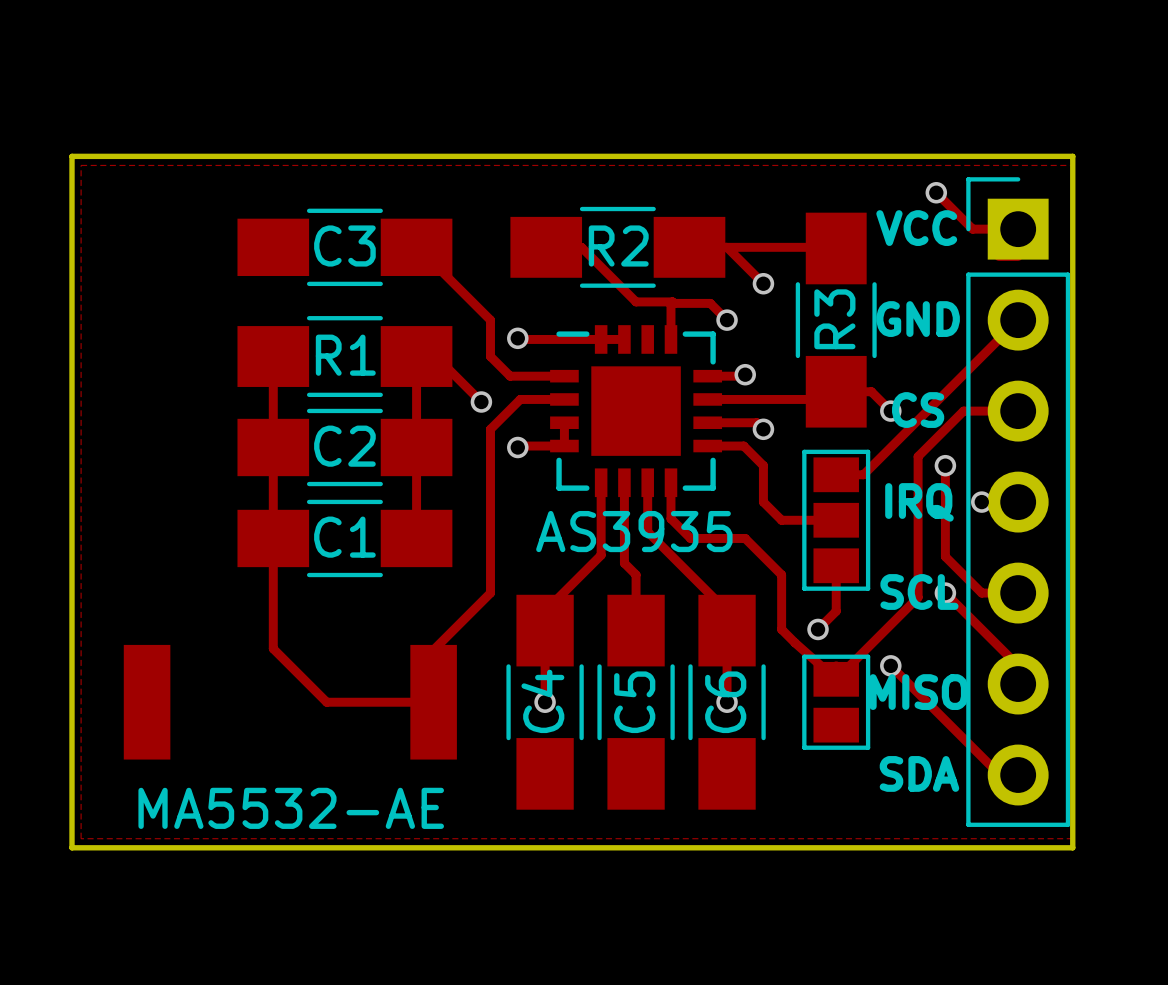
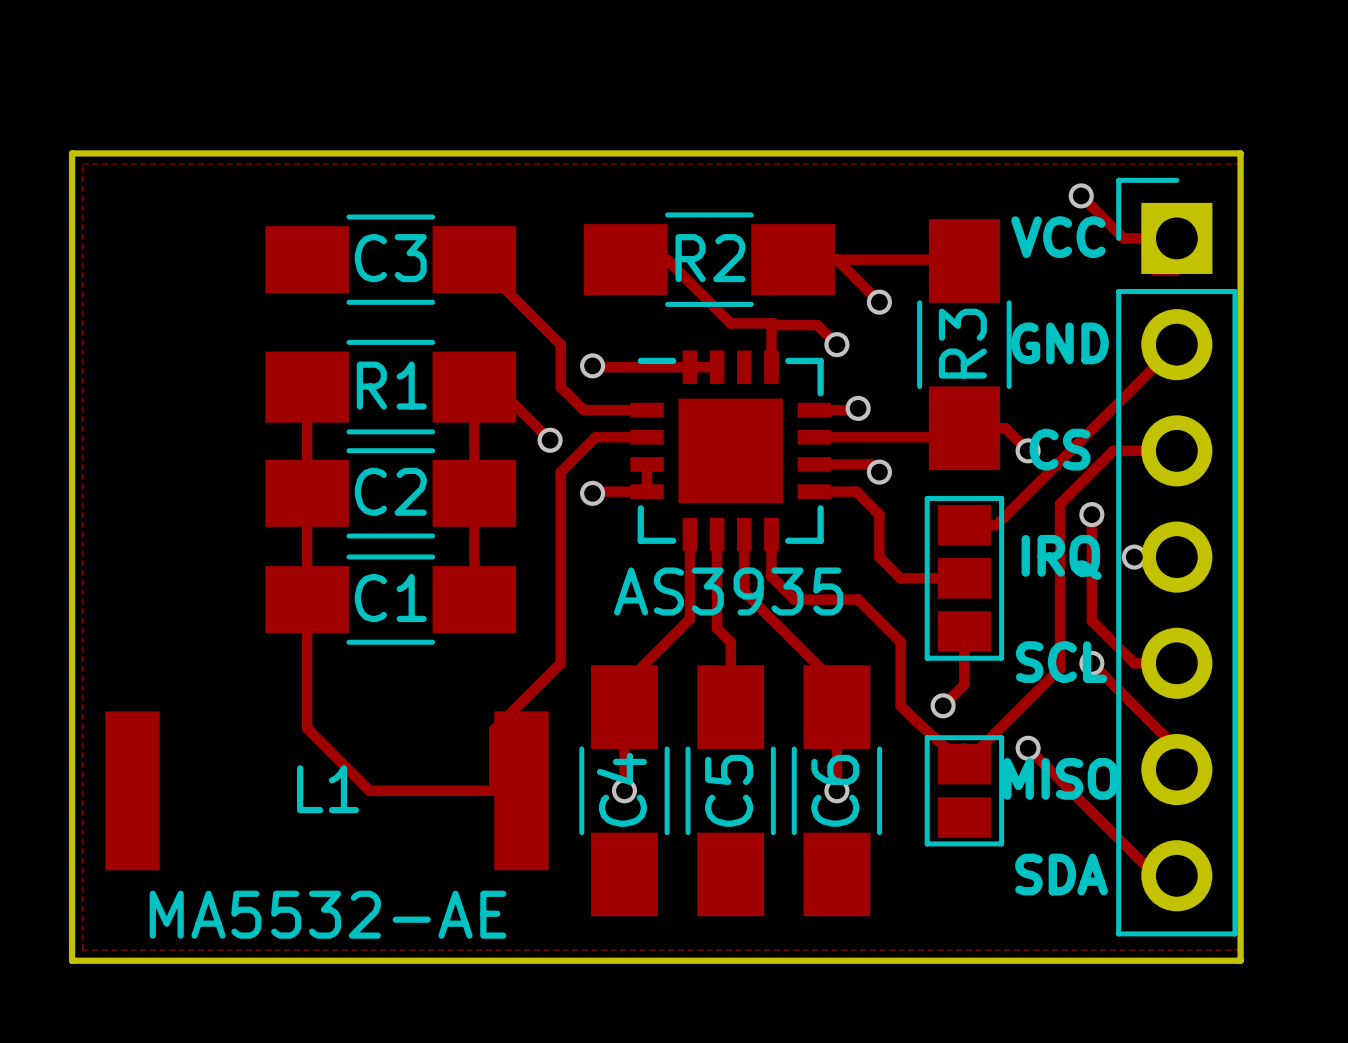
part: MA5532-AE (290, 702) -> none
L1: none -> MA5532-AE (327, 790)

